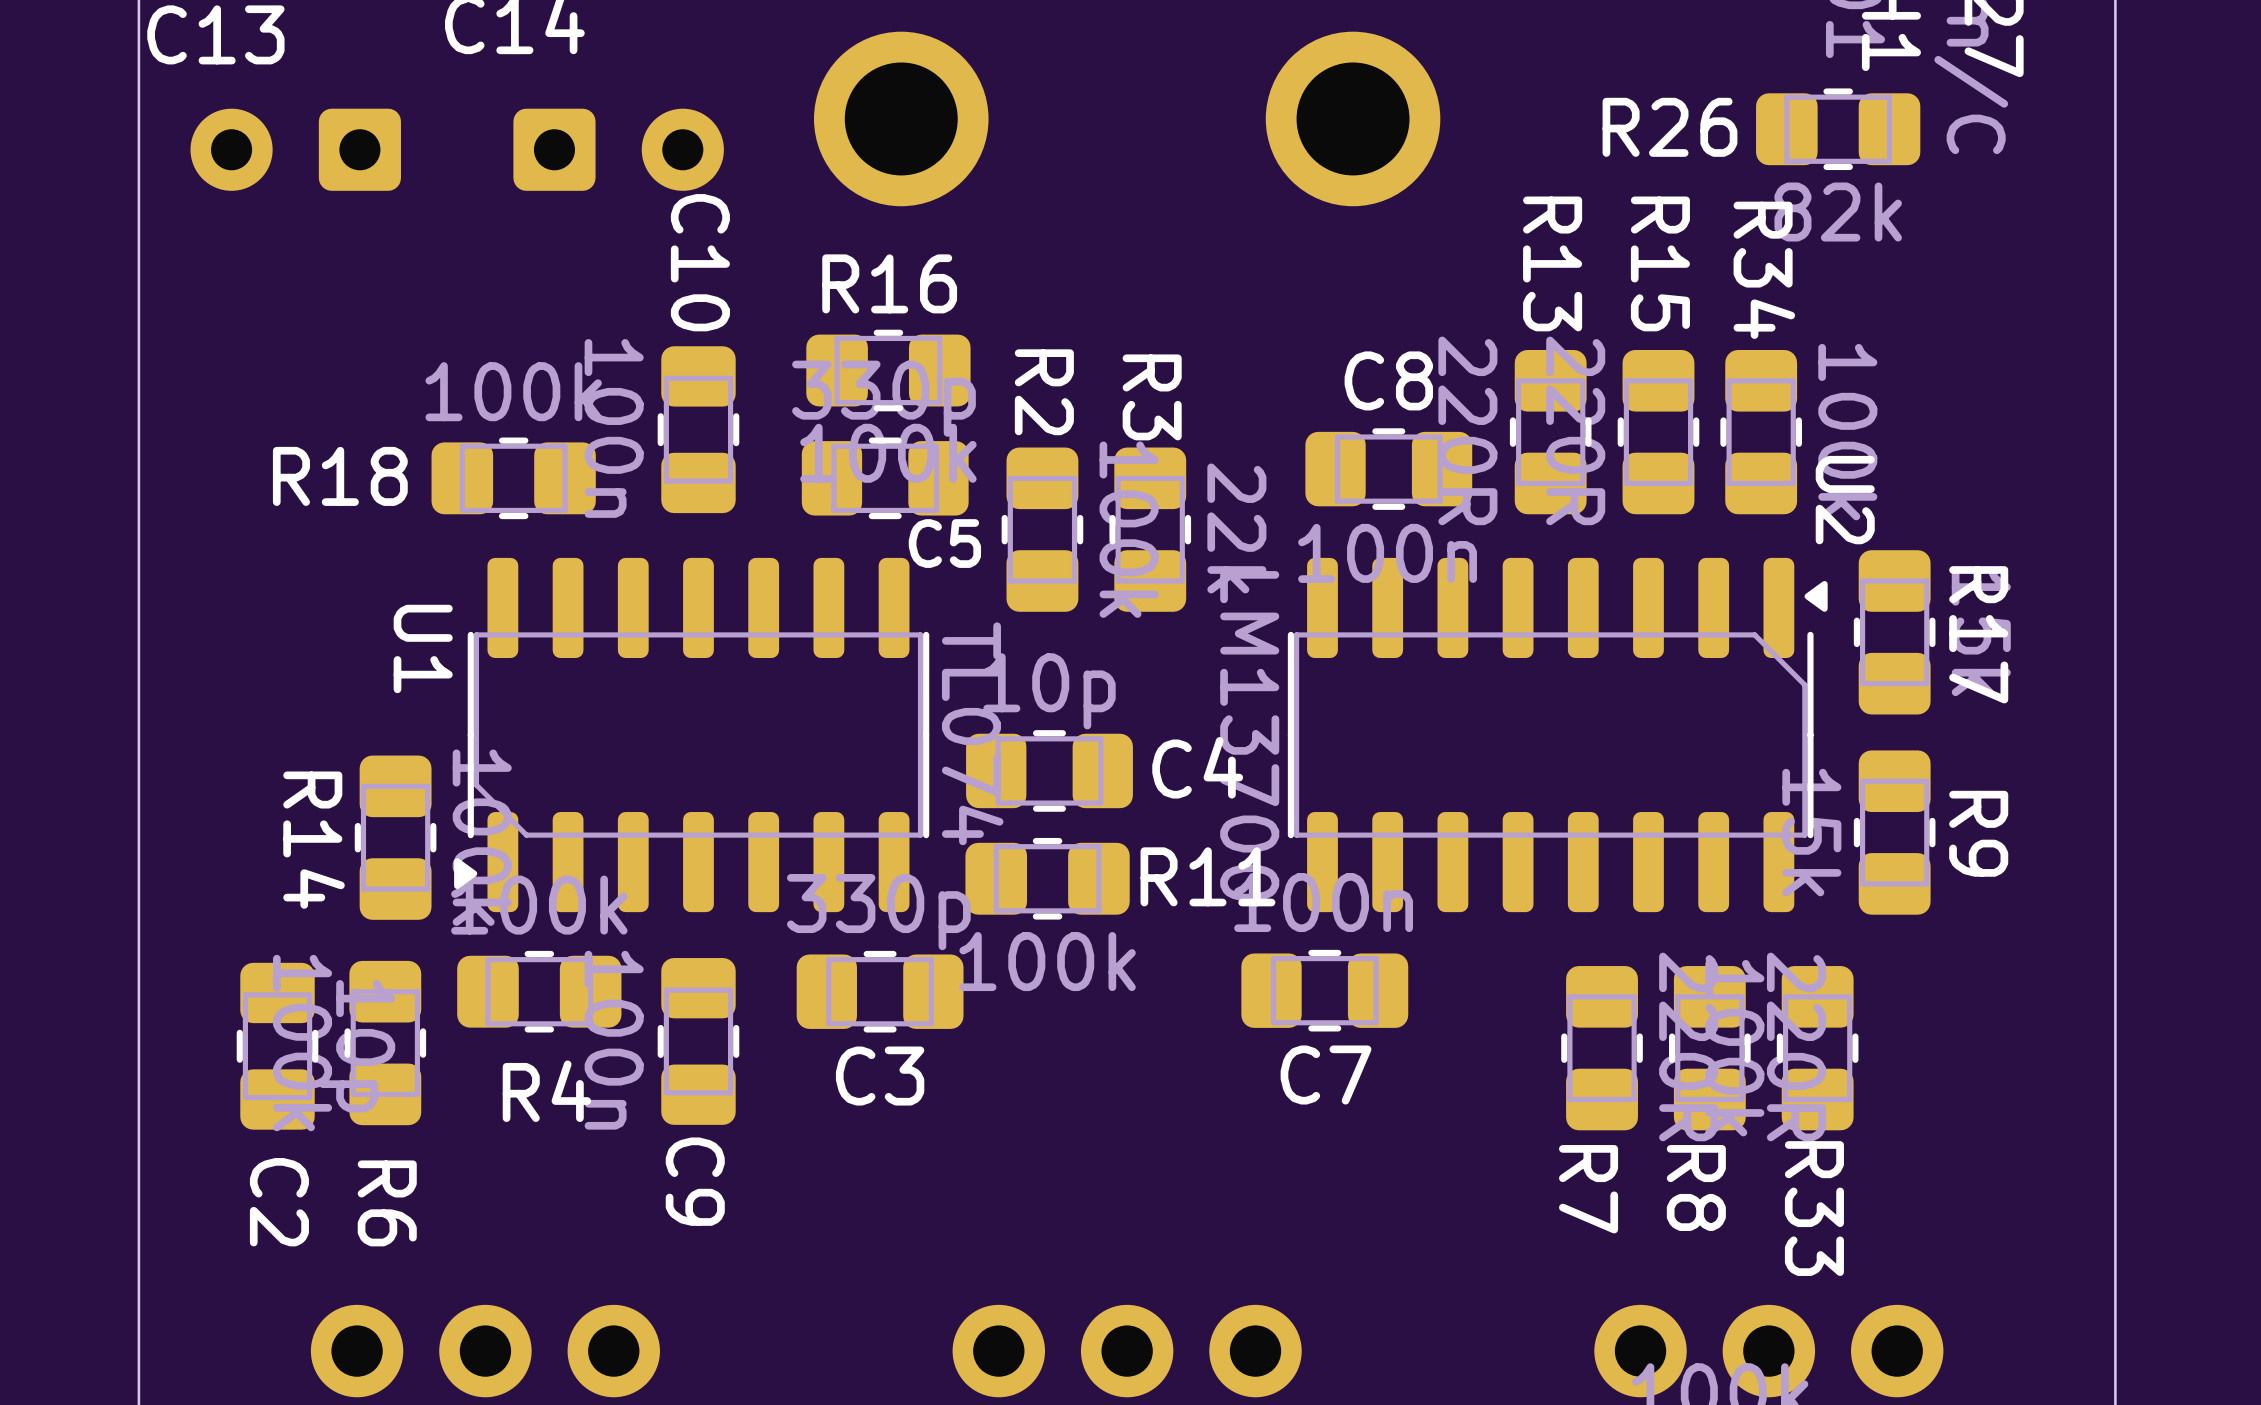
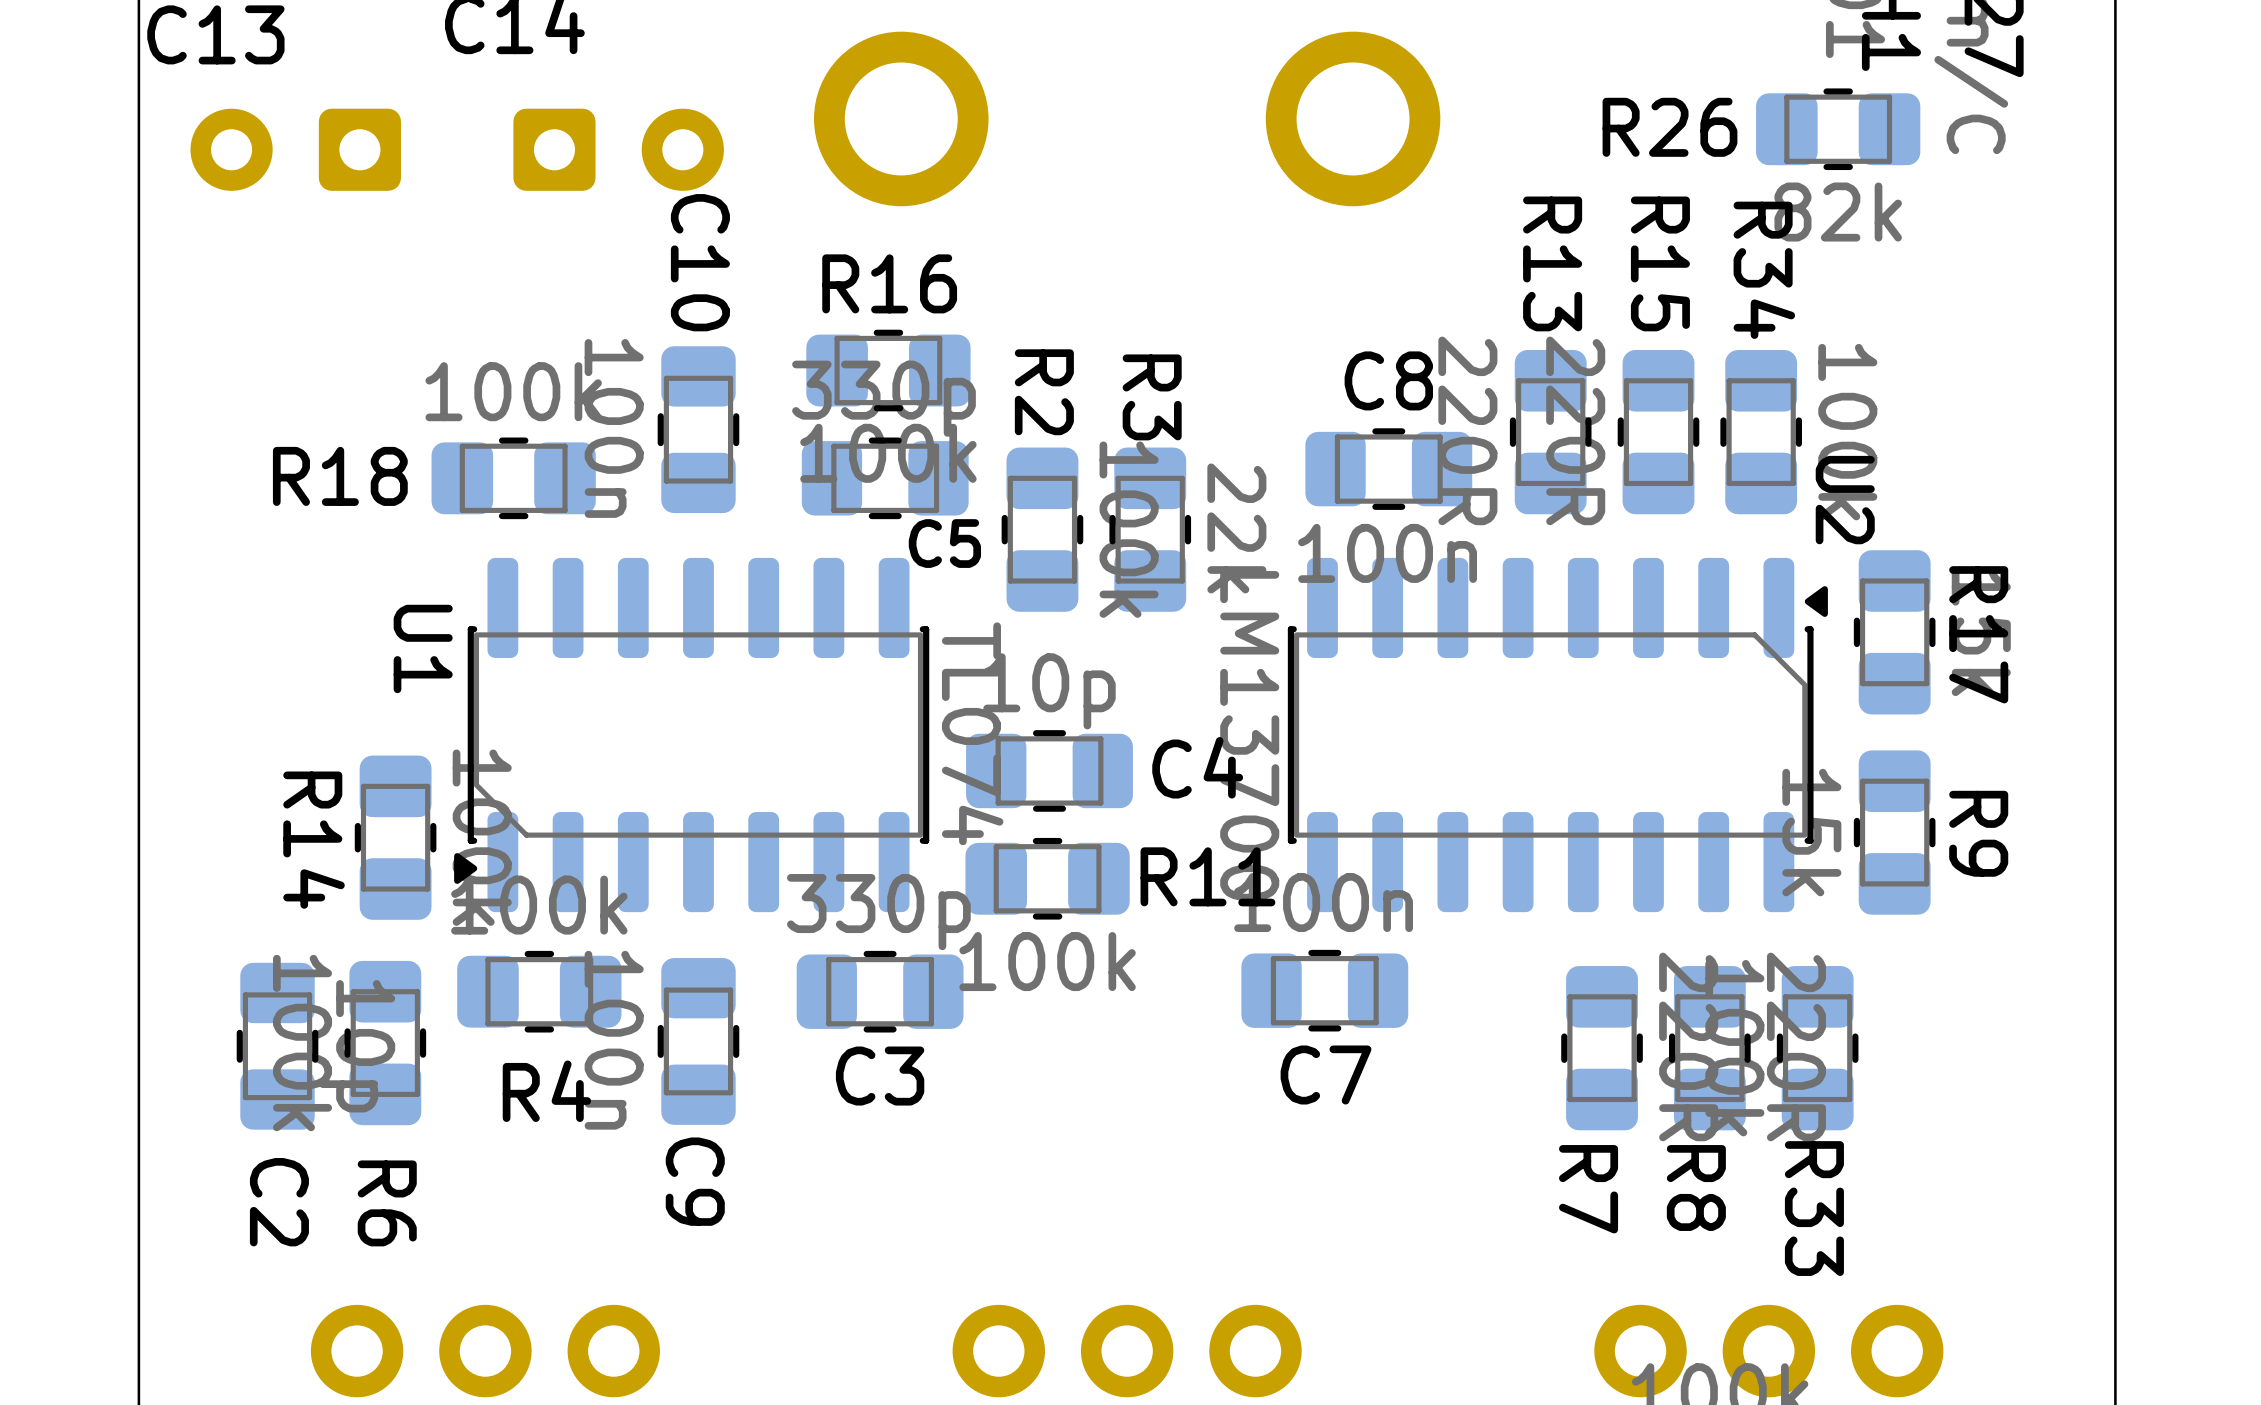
U1 footprint: [454, 557, 930, 913] -> [454, 557, 930, 913]
U2 footprint: [1287, 557, 1828, 913] -> [1287, 557, 1828, 913]

